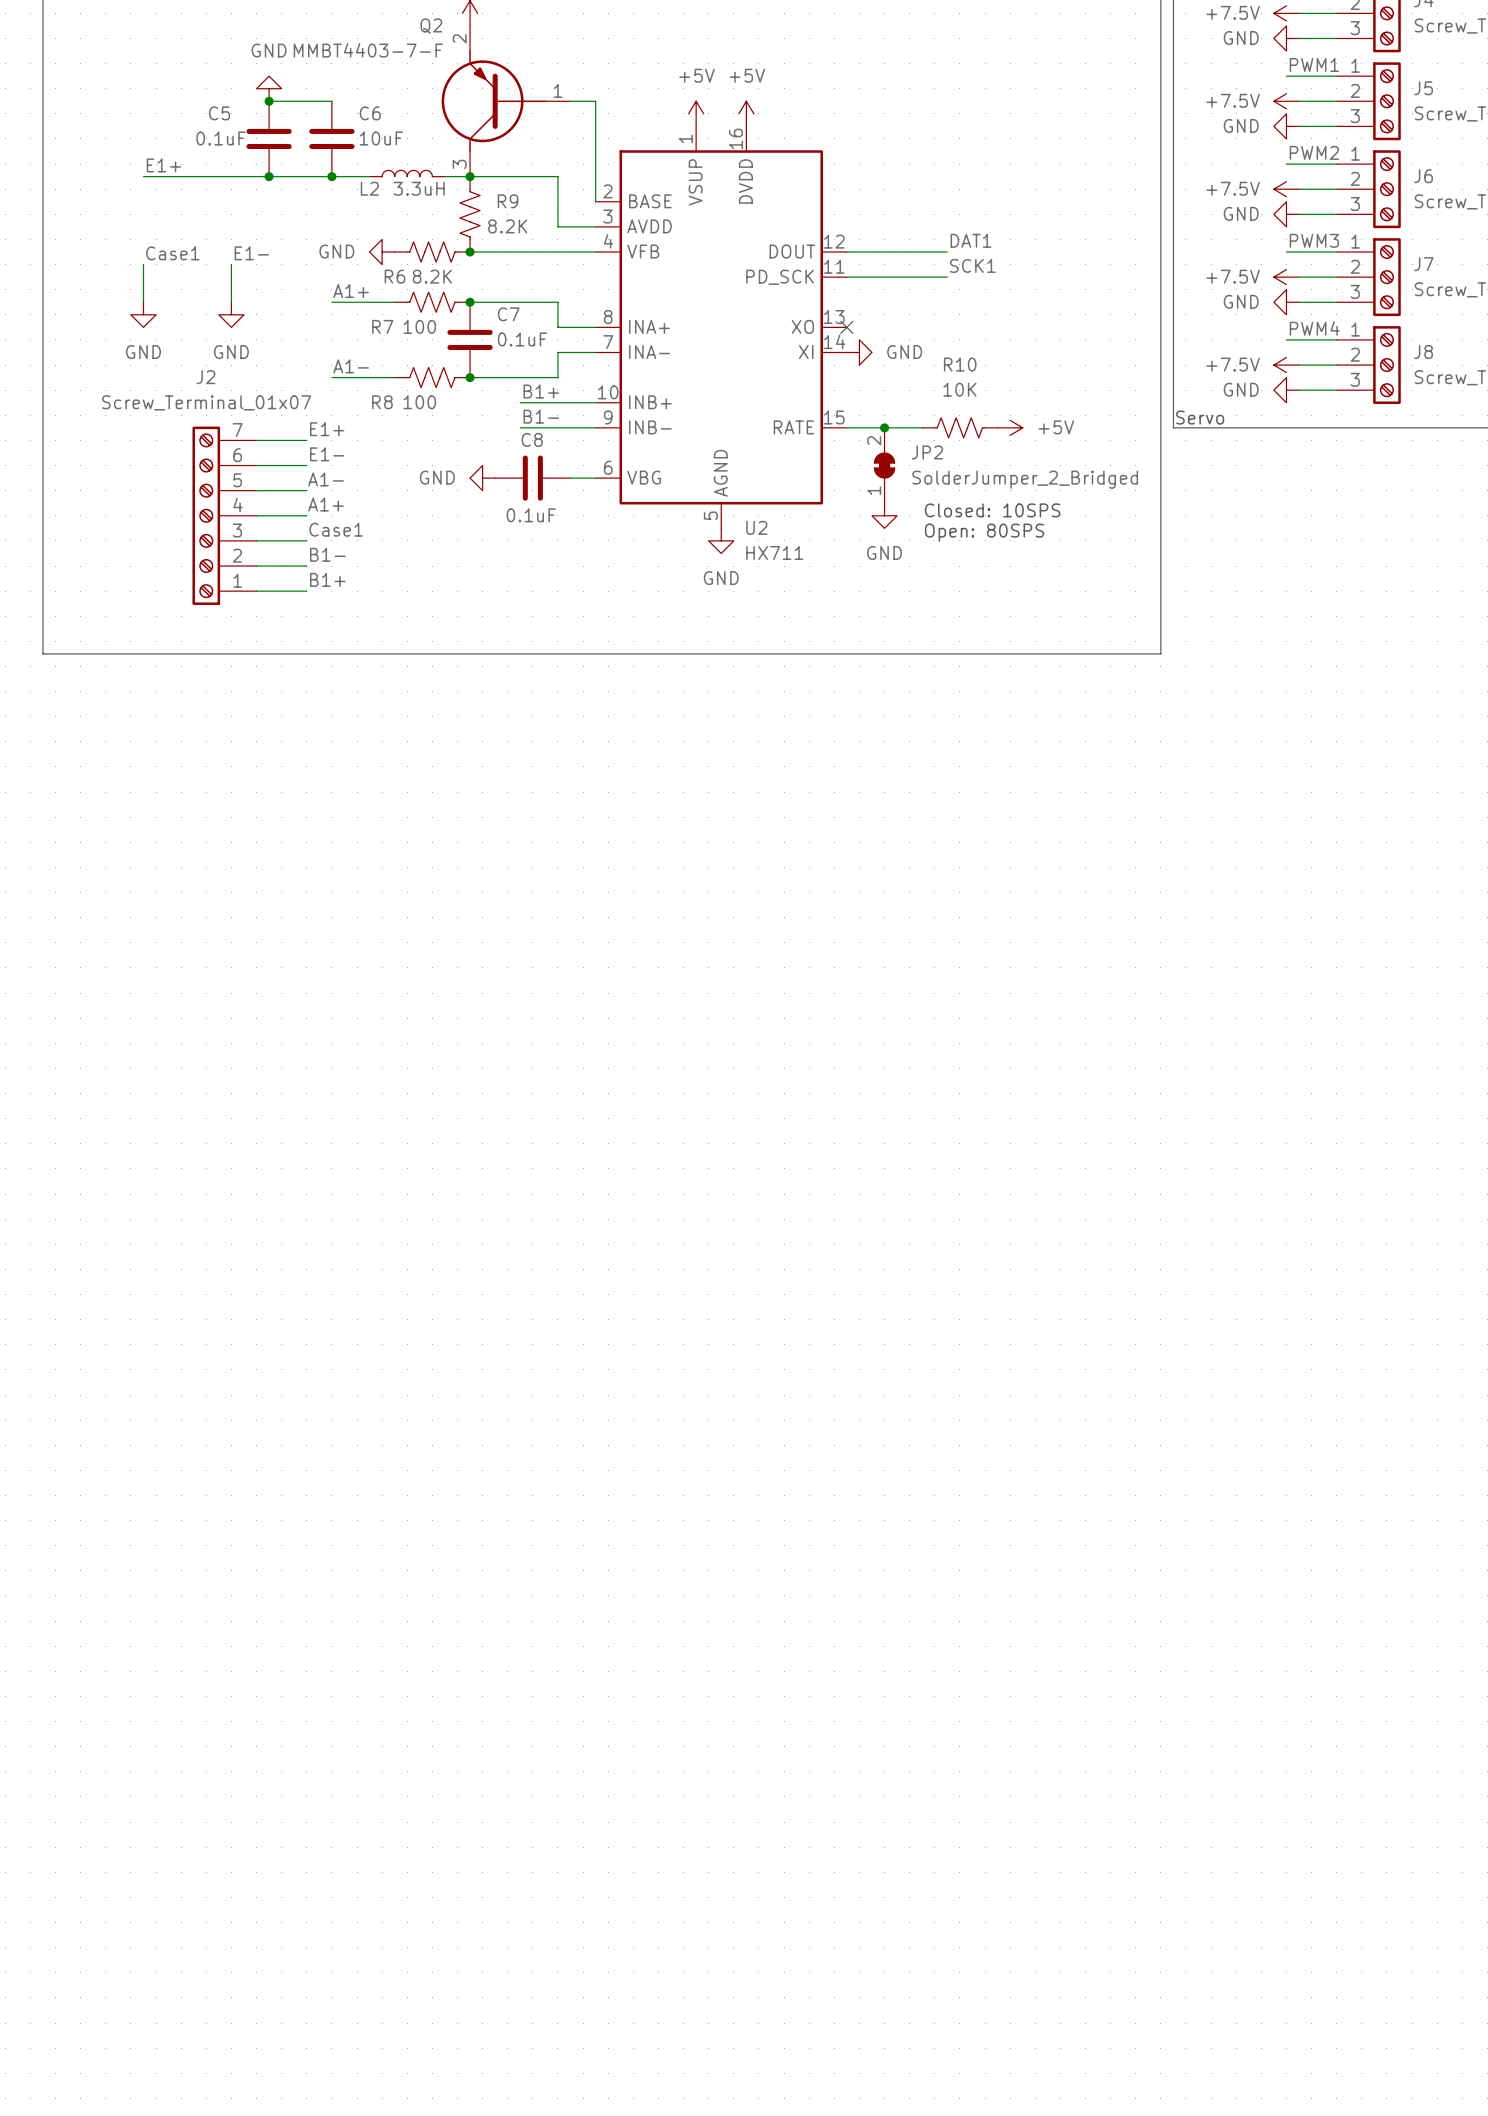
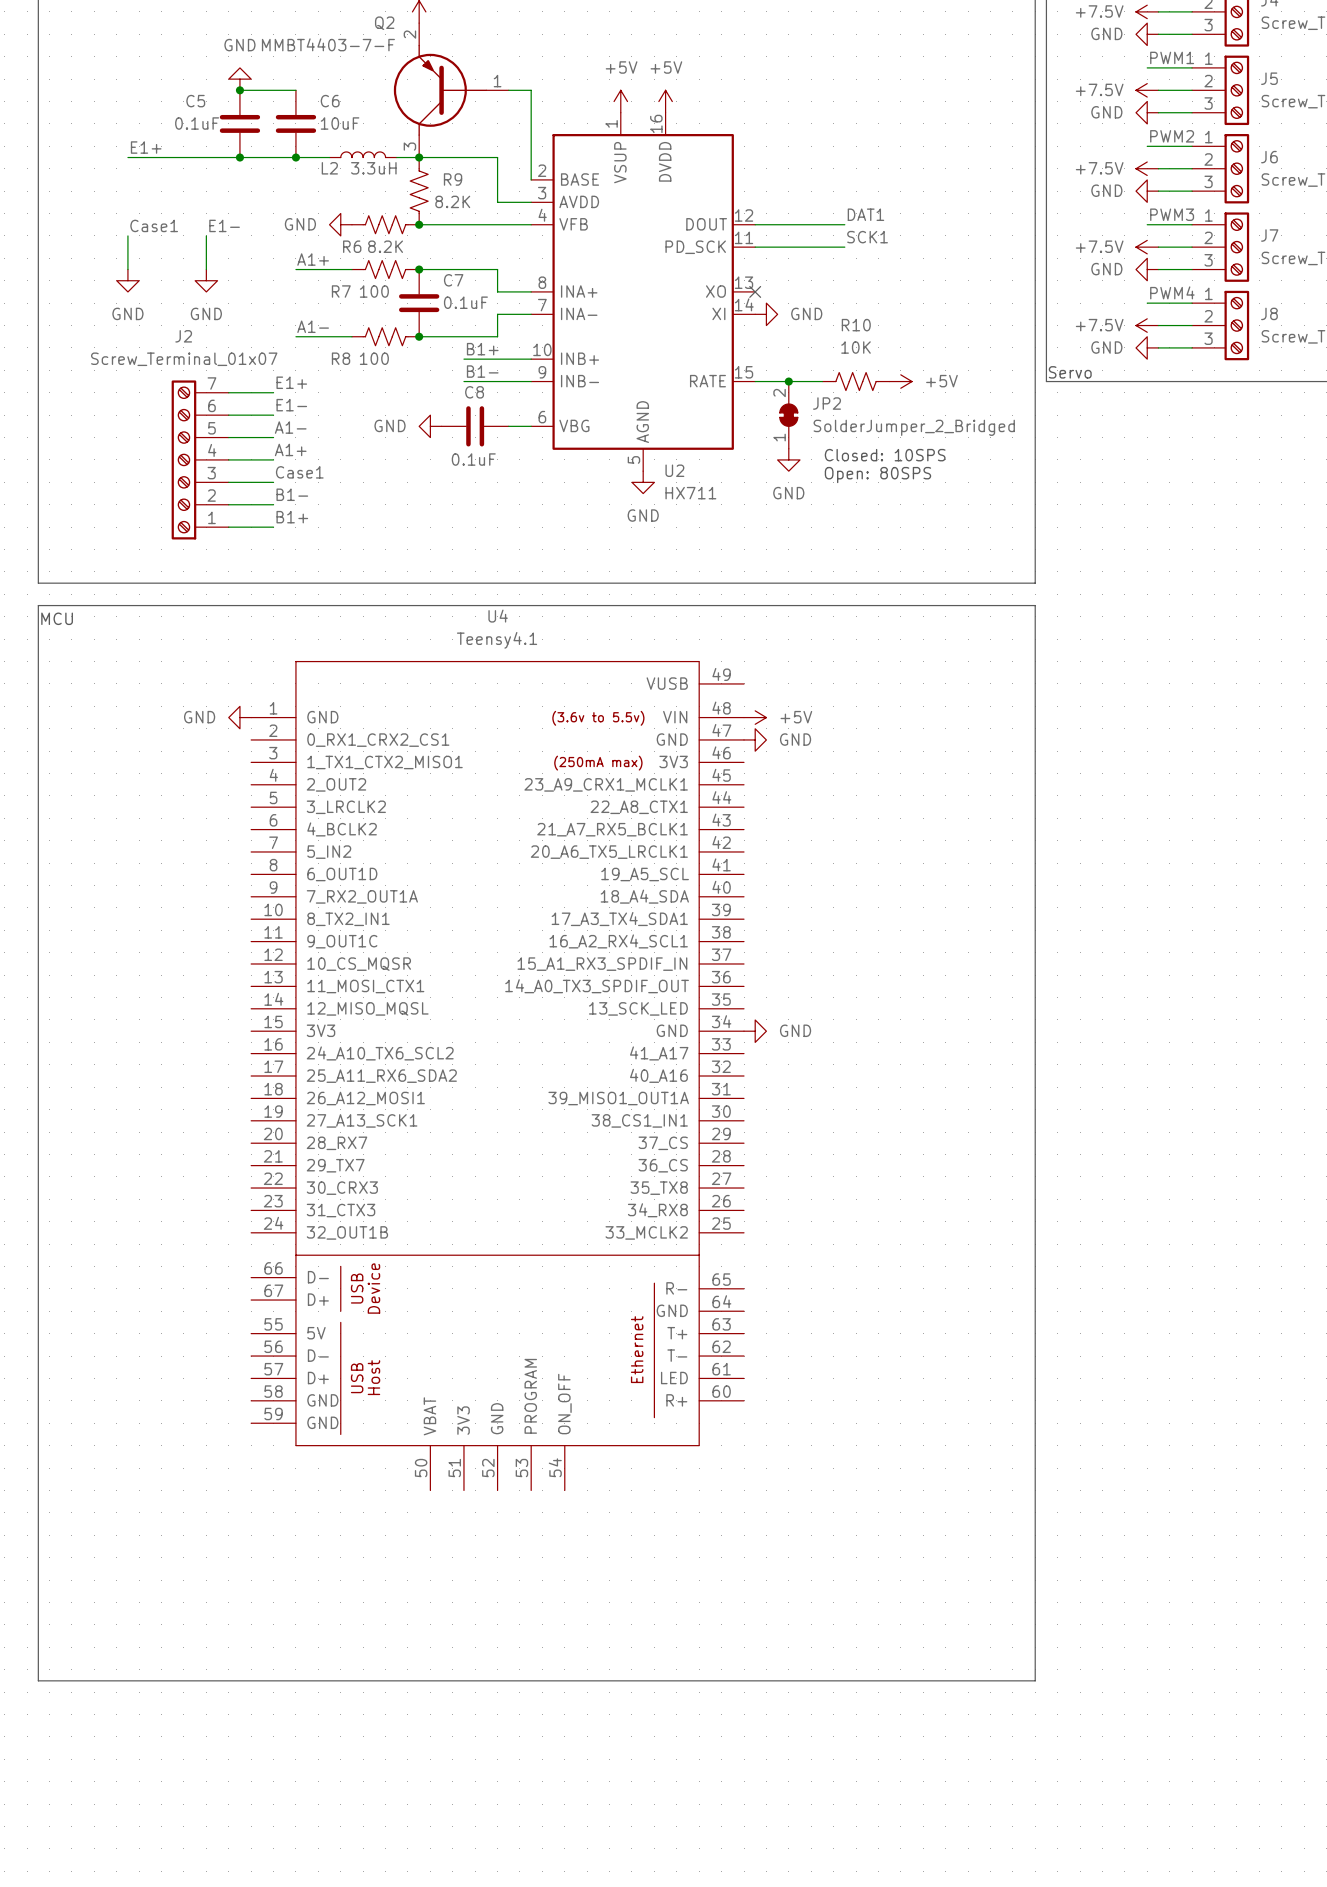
line: none -> (38, 605) (1035, 605) (1035, 1680) (38, 1680) (38, 605)
text: none -> MCU (57, 618)
power symbol: none -> GND (239, 717)
power symbol: none -> +5V (755, 717)
power symbol: none -> GND (755, 739)
power symbol: none -> GND (755, 1031)
U4: none -> Teensy4.1 (497, 1076)

